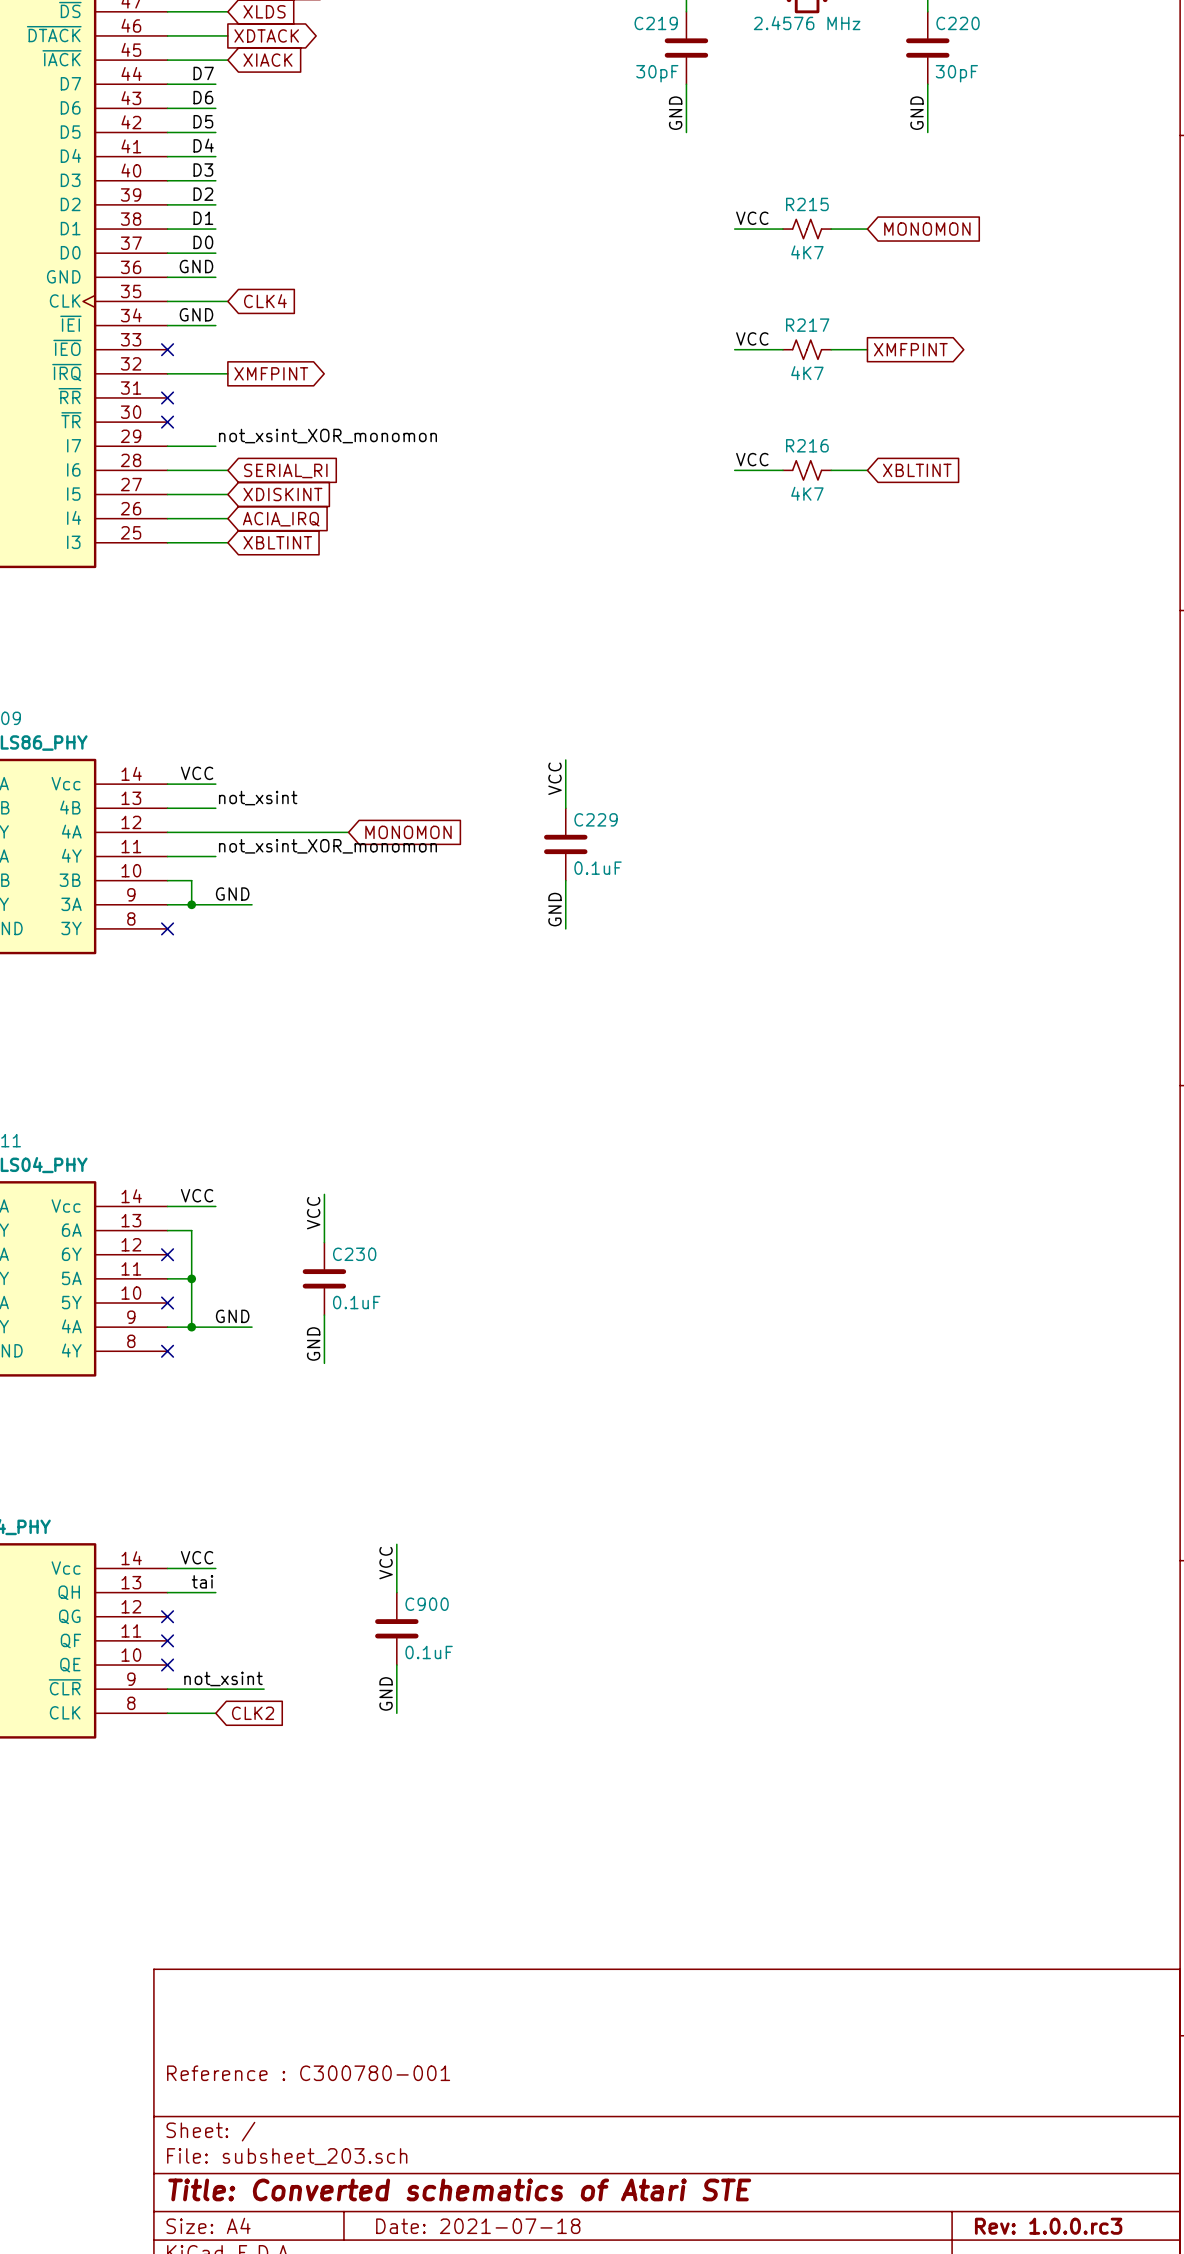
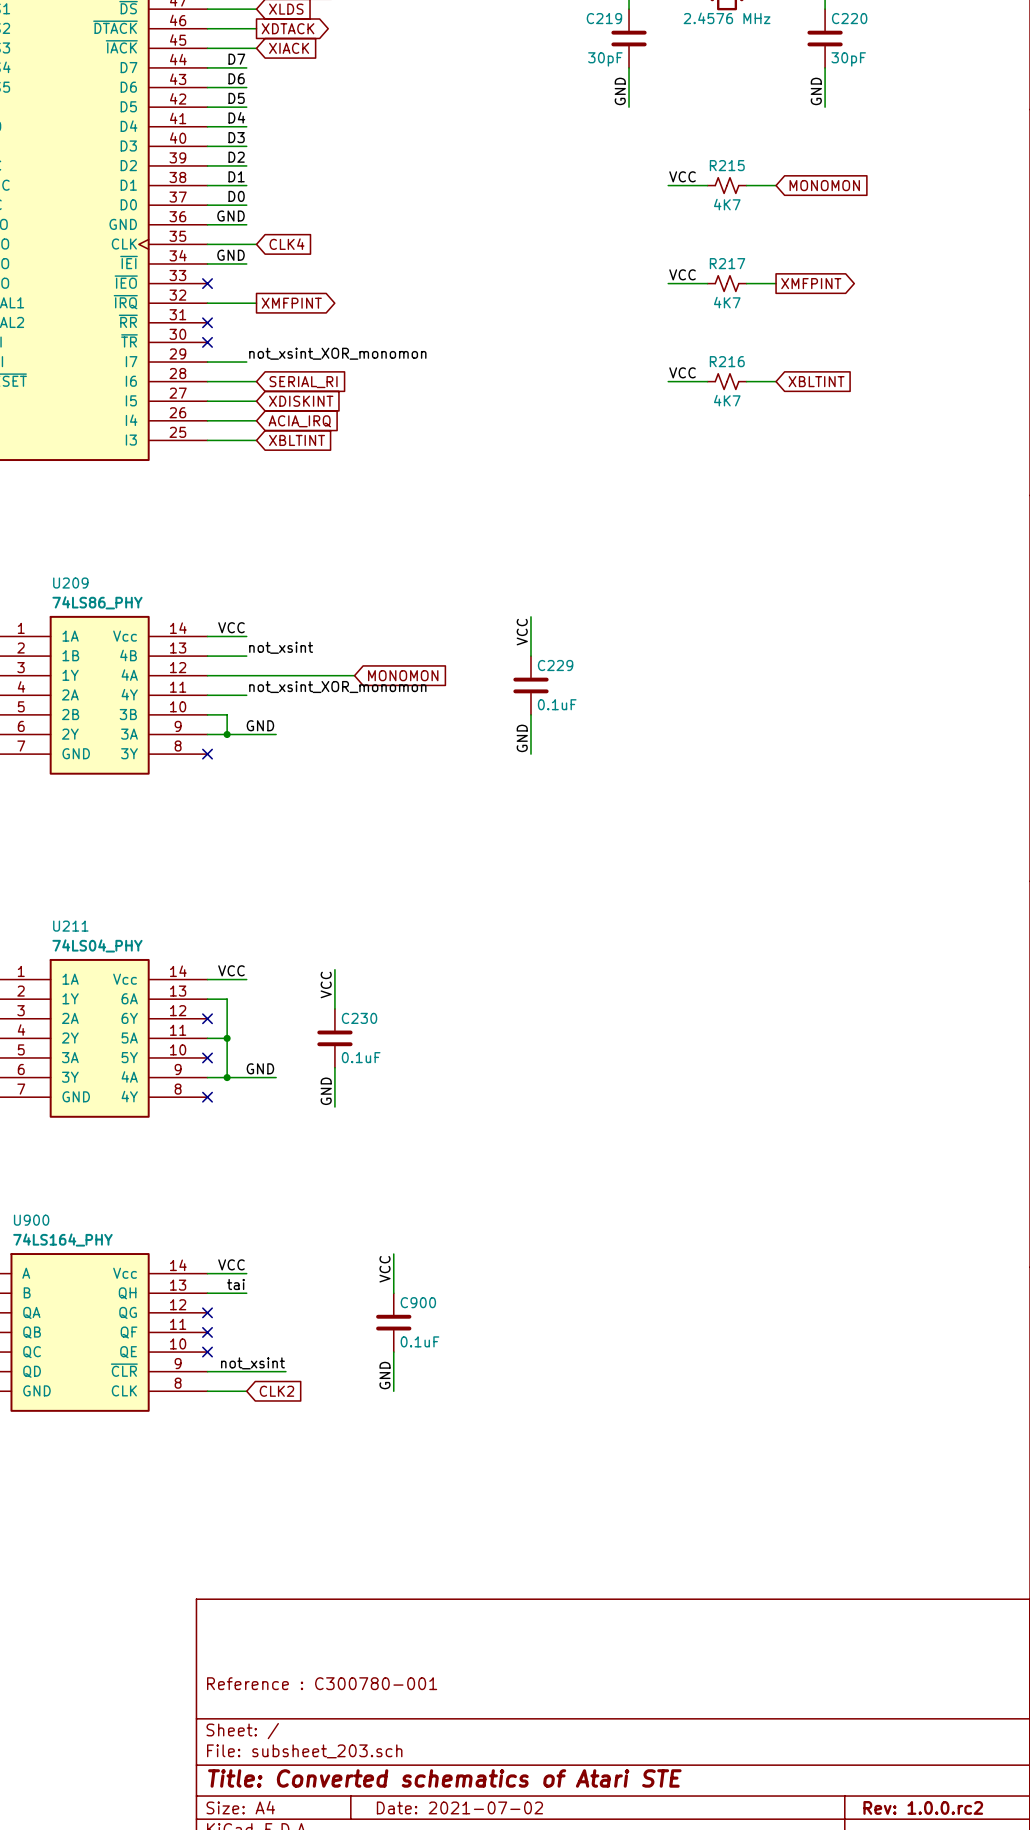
title block: Date: 2021-07-18 (478, 2226) -> Date: 2021-07-02 (459, 1807)
title block: Rev: 1.0.0.rc3 (1048, 2226) -> Rev: 1.0.0.rc2 (923, 1807)

